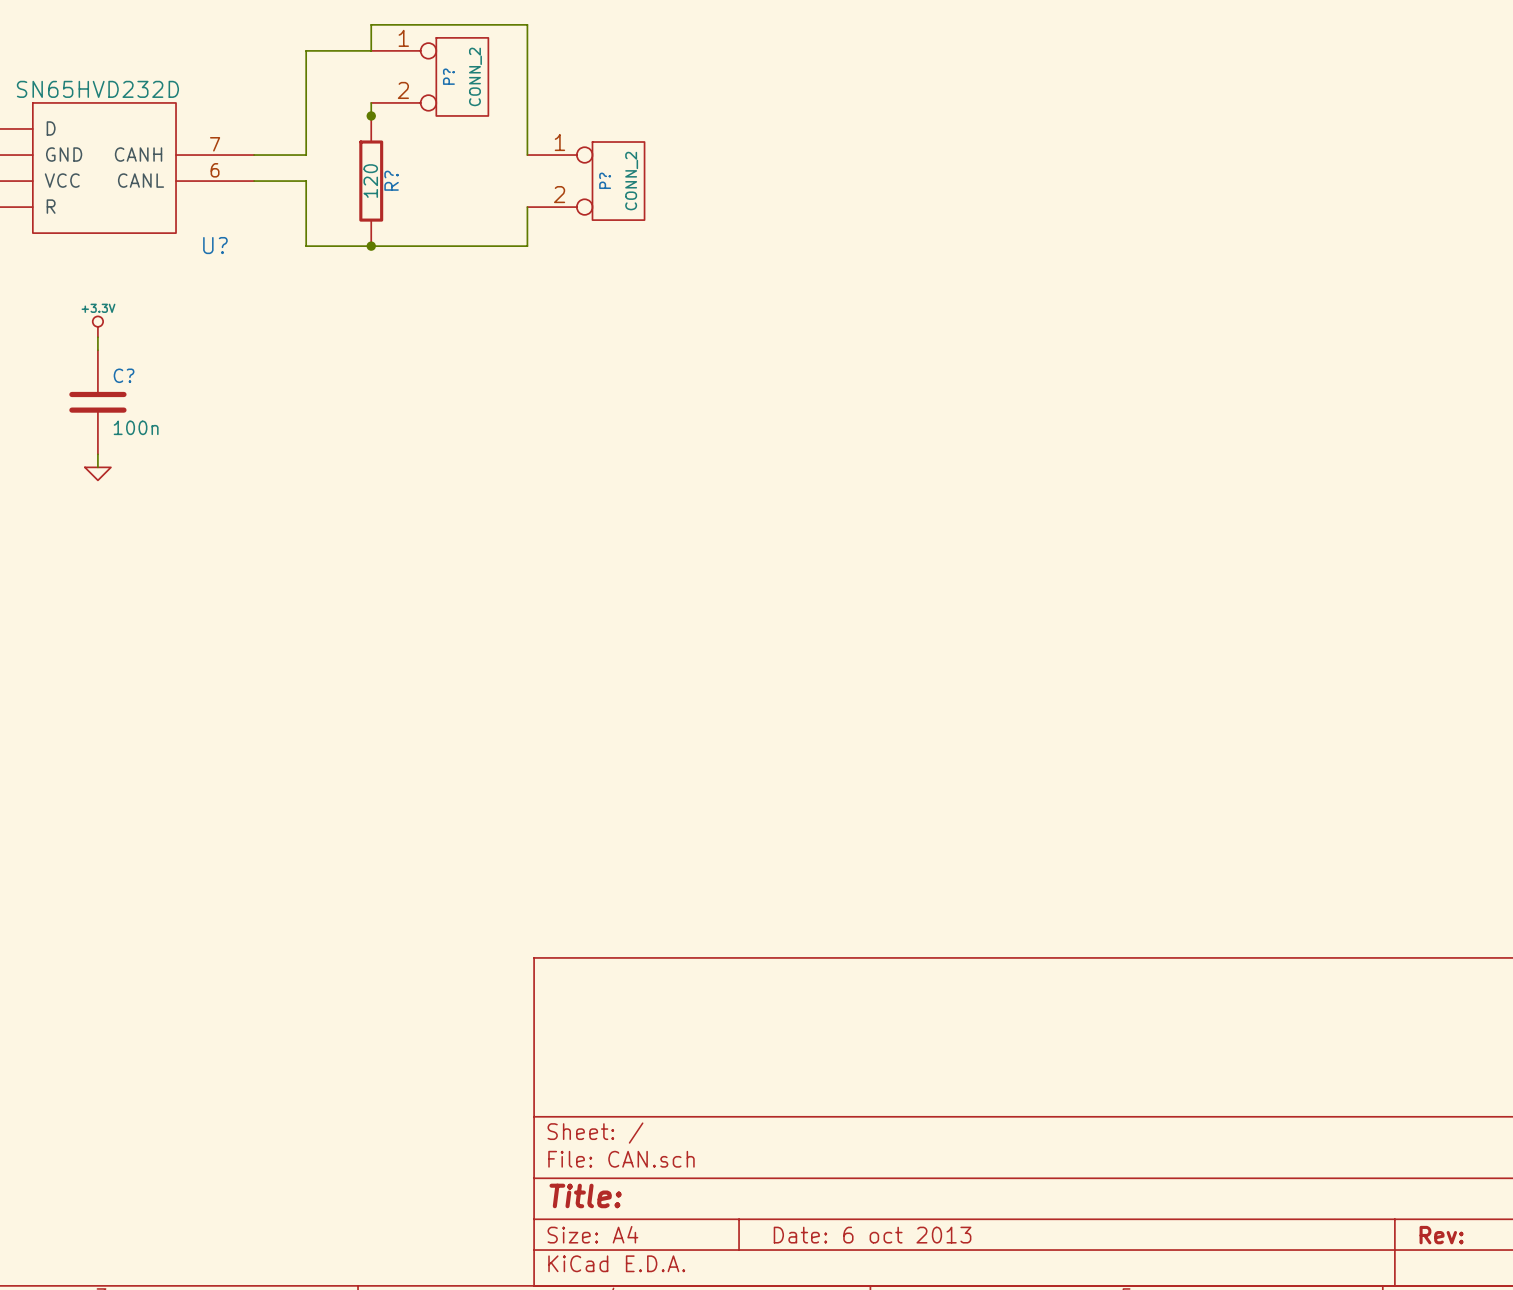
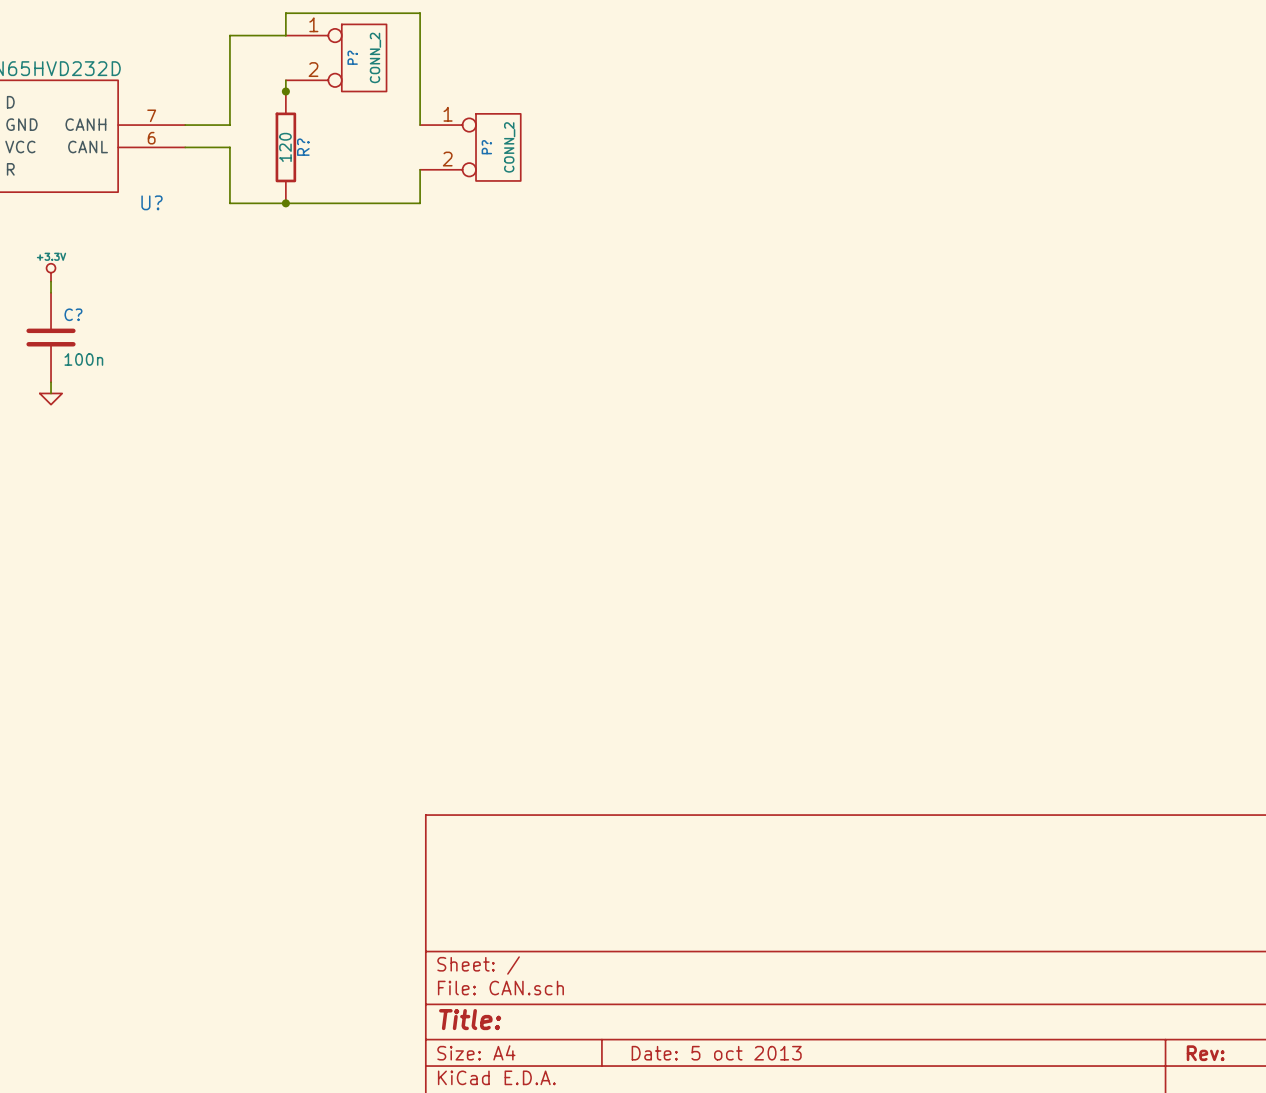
title block: Date: 6 oct 2013 (872, 1235) -> Date: 5 oct 2013 (716, 1053)

